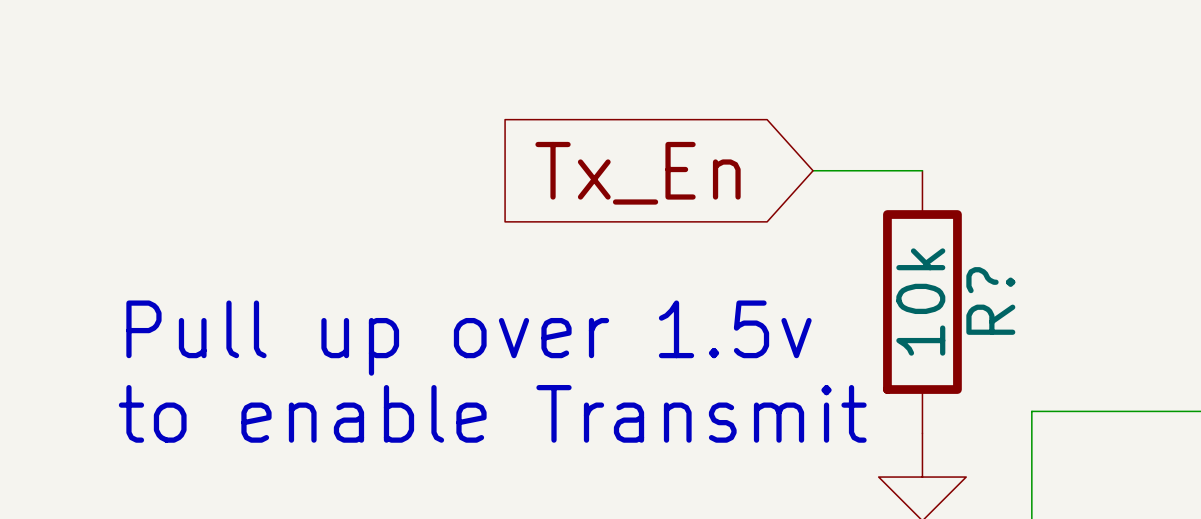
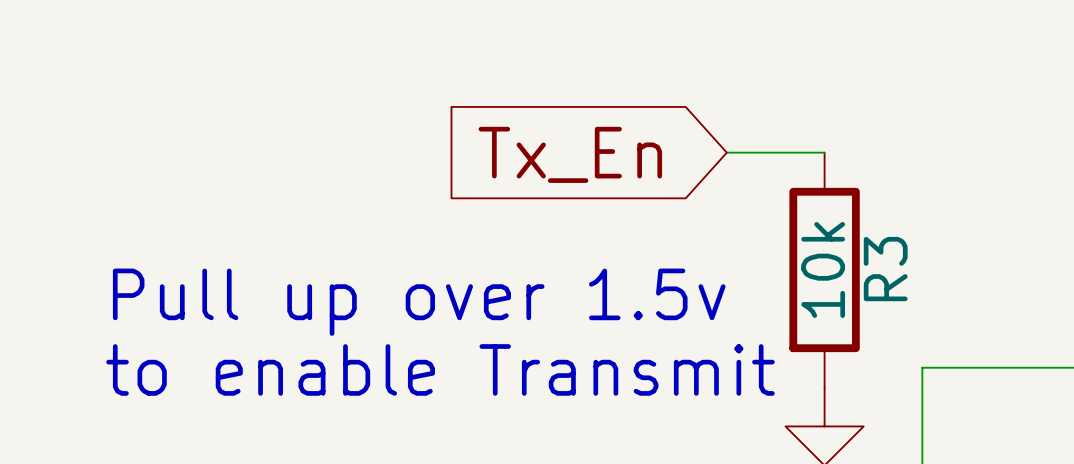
R? name: R? (990, 300) -> R3 (885, 269)

